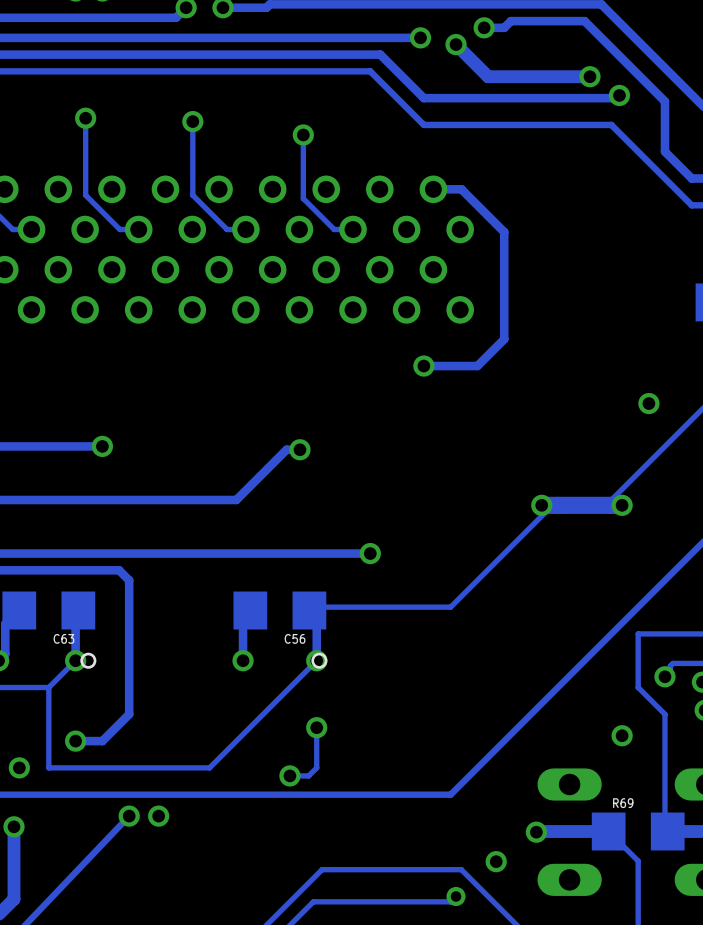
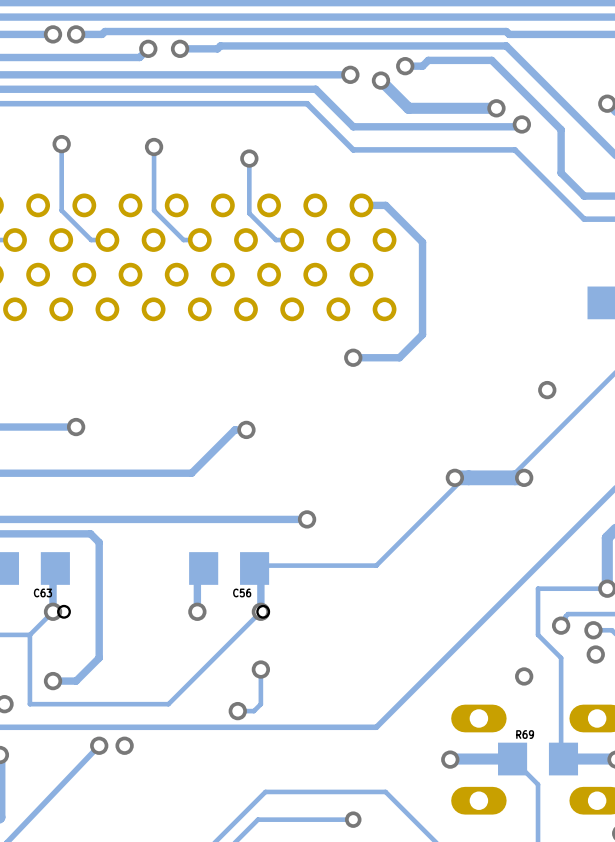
via: (496, 861) -> none
track: (456, 896) (450, 901) (423, 901) -> none
via: (456, 896) -> none
via: none -> (353, 819)

